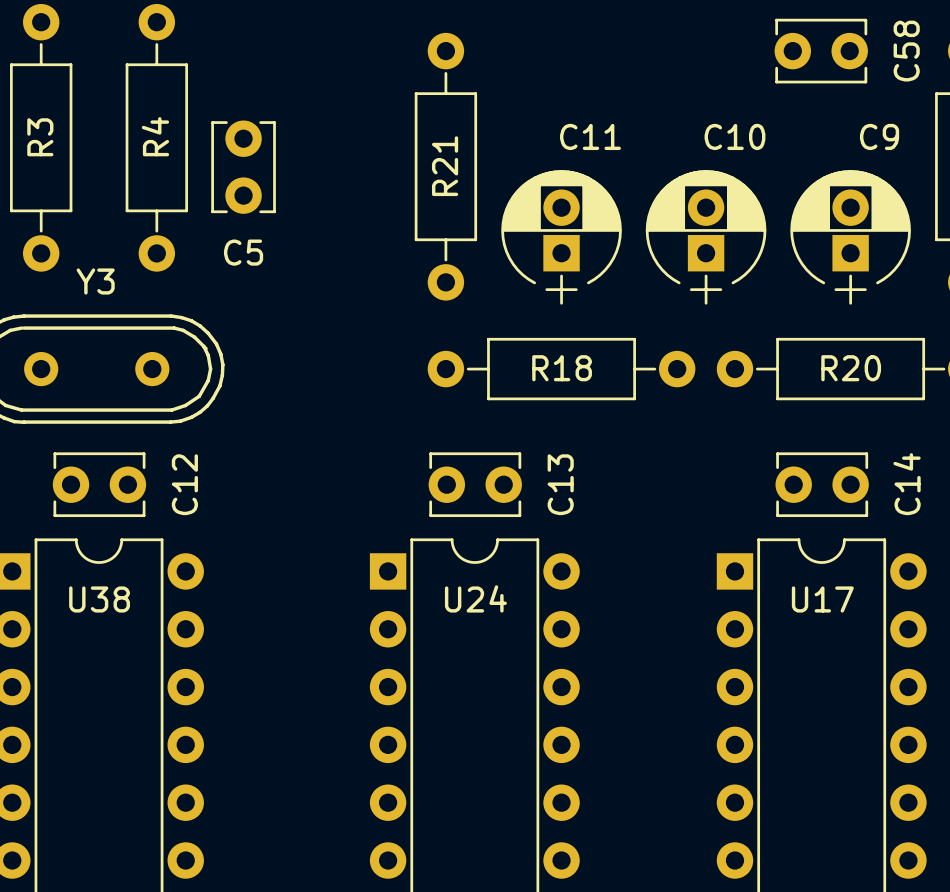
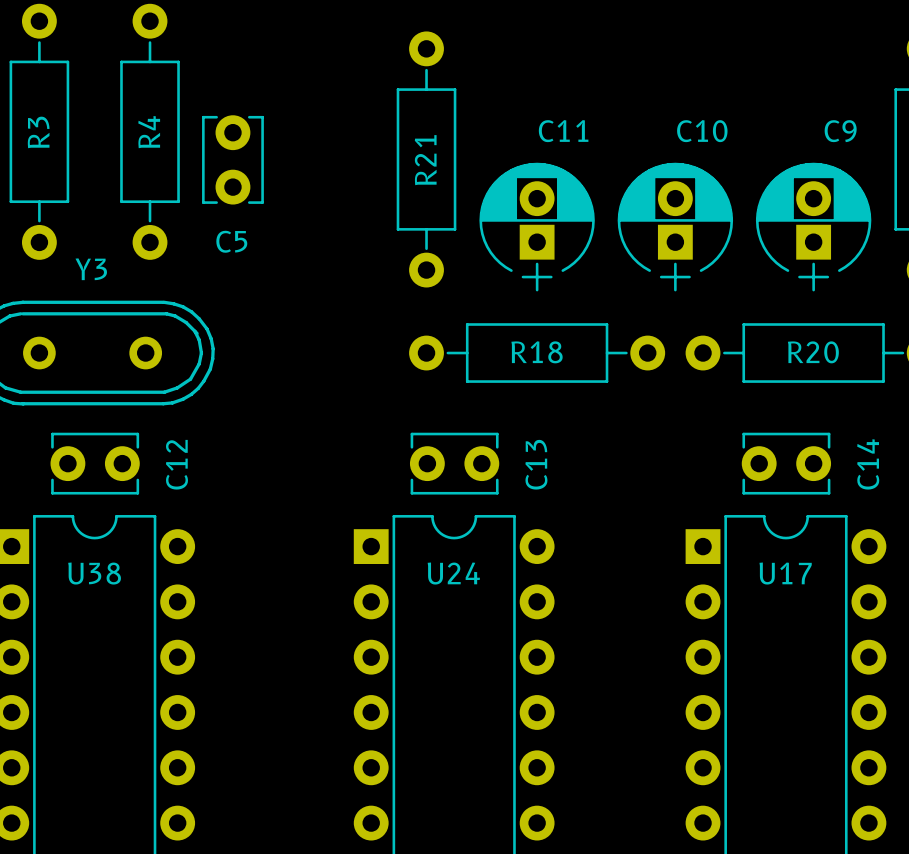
C58: (821, 51) -> none

